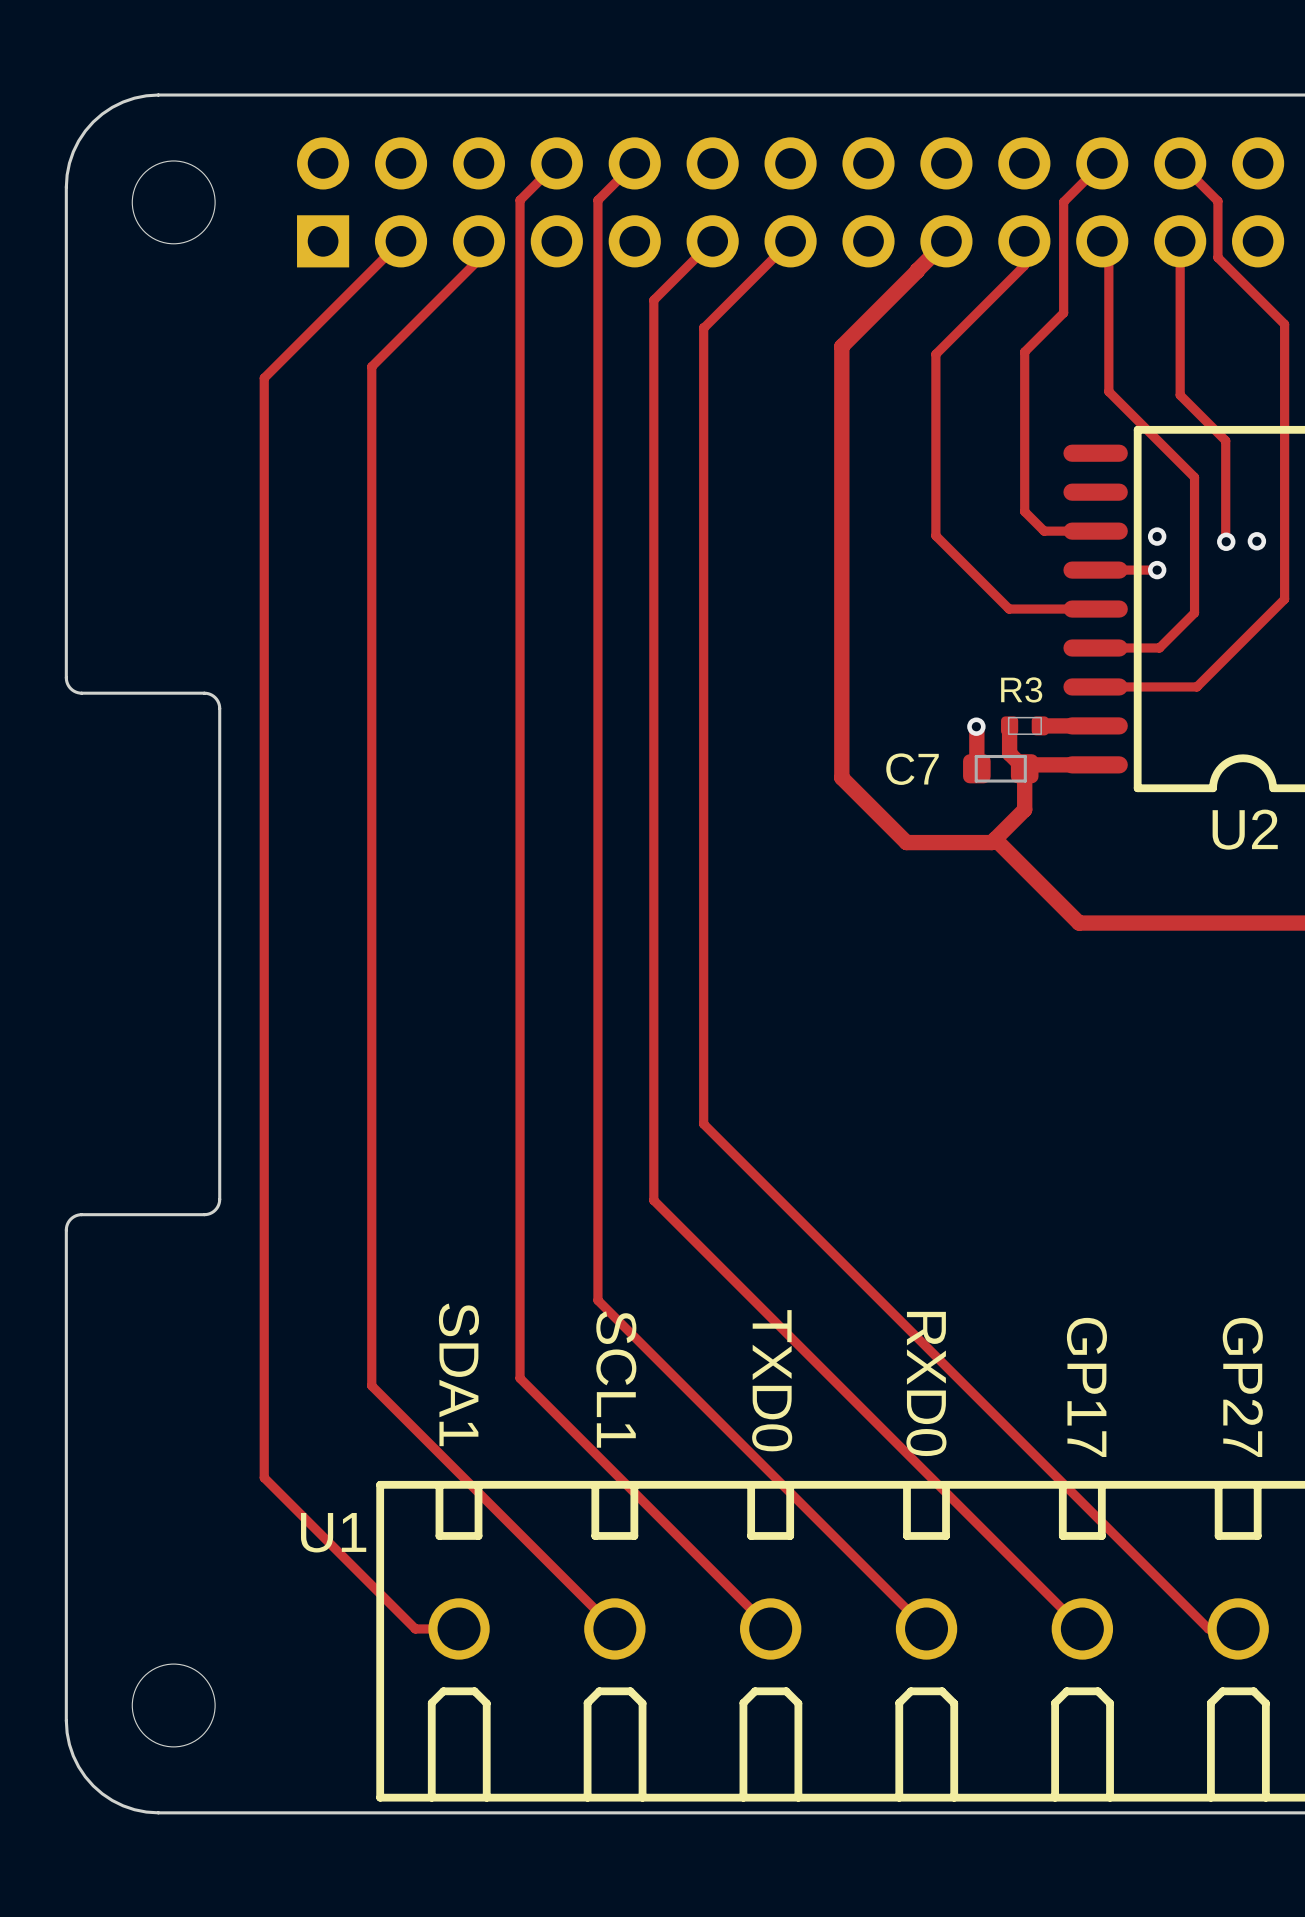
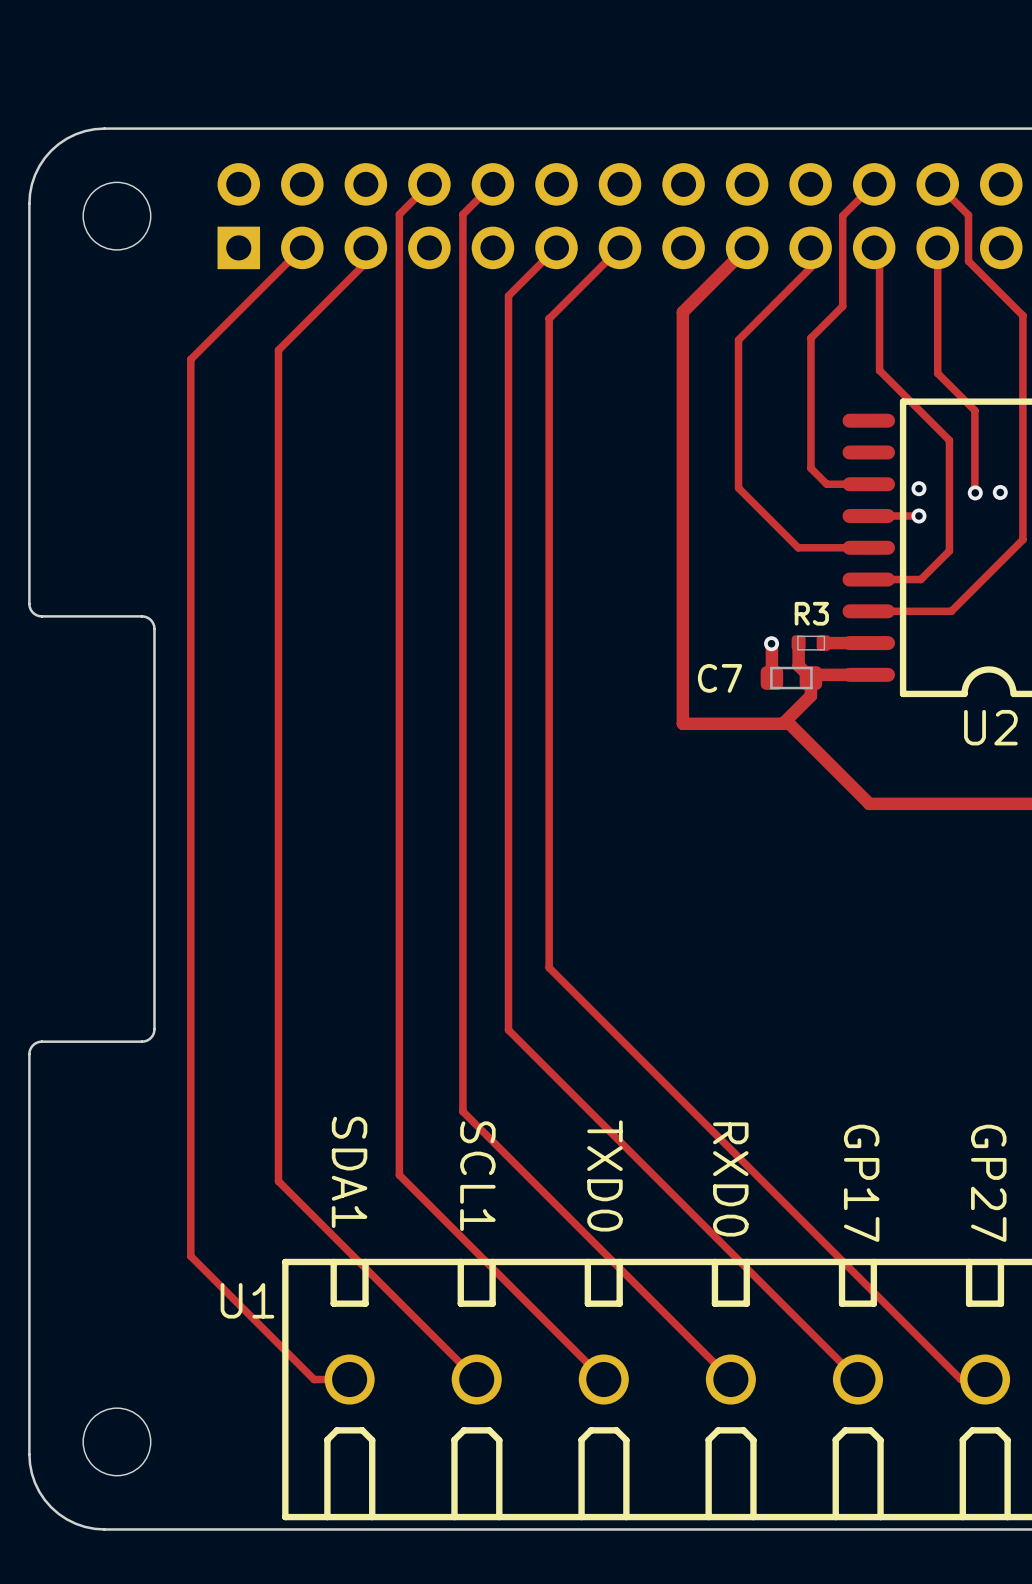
track: (917, 271) (841, 346) (841, 777) (906, 842) (991, 842) (1024, 809) (1024, 790) -> (723, 271) (682, 312) (682, 723) (789, 723) (869, 803)
track: none -> (810, 695) (782, 723)
track: (995, 839) (1079, 923) (1096, 923) -> none

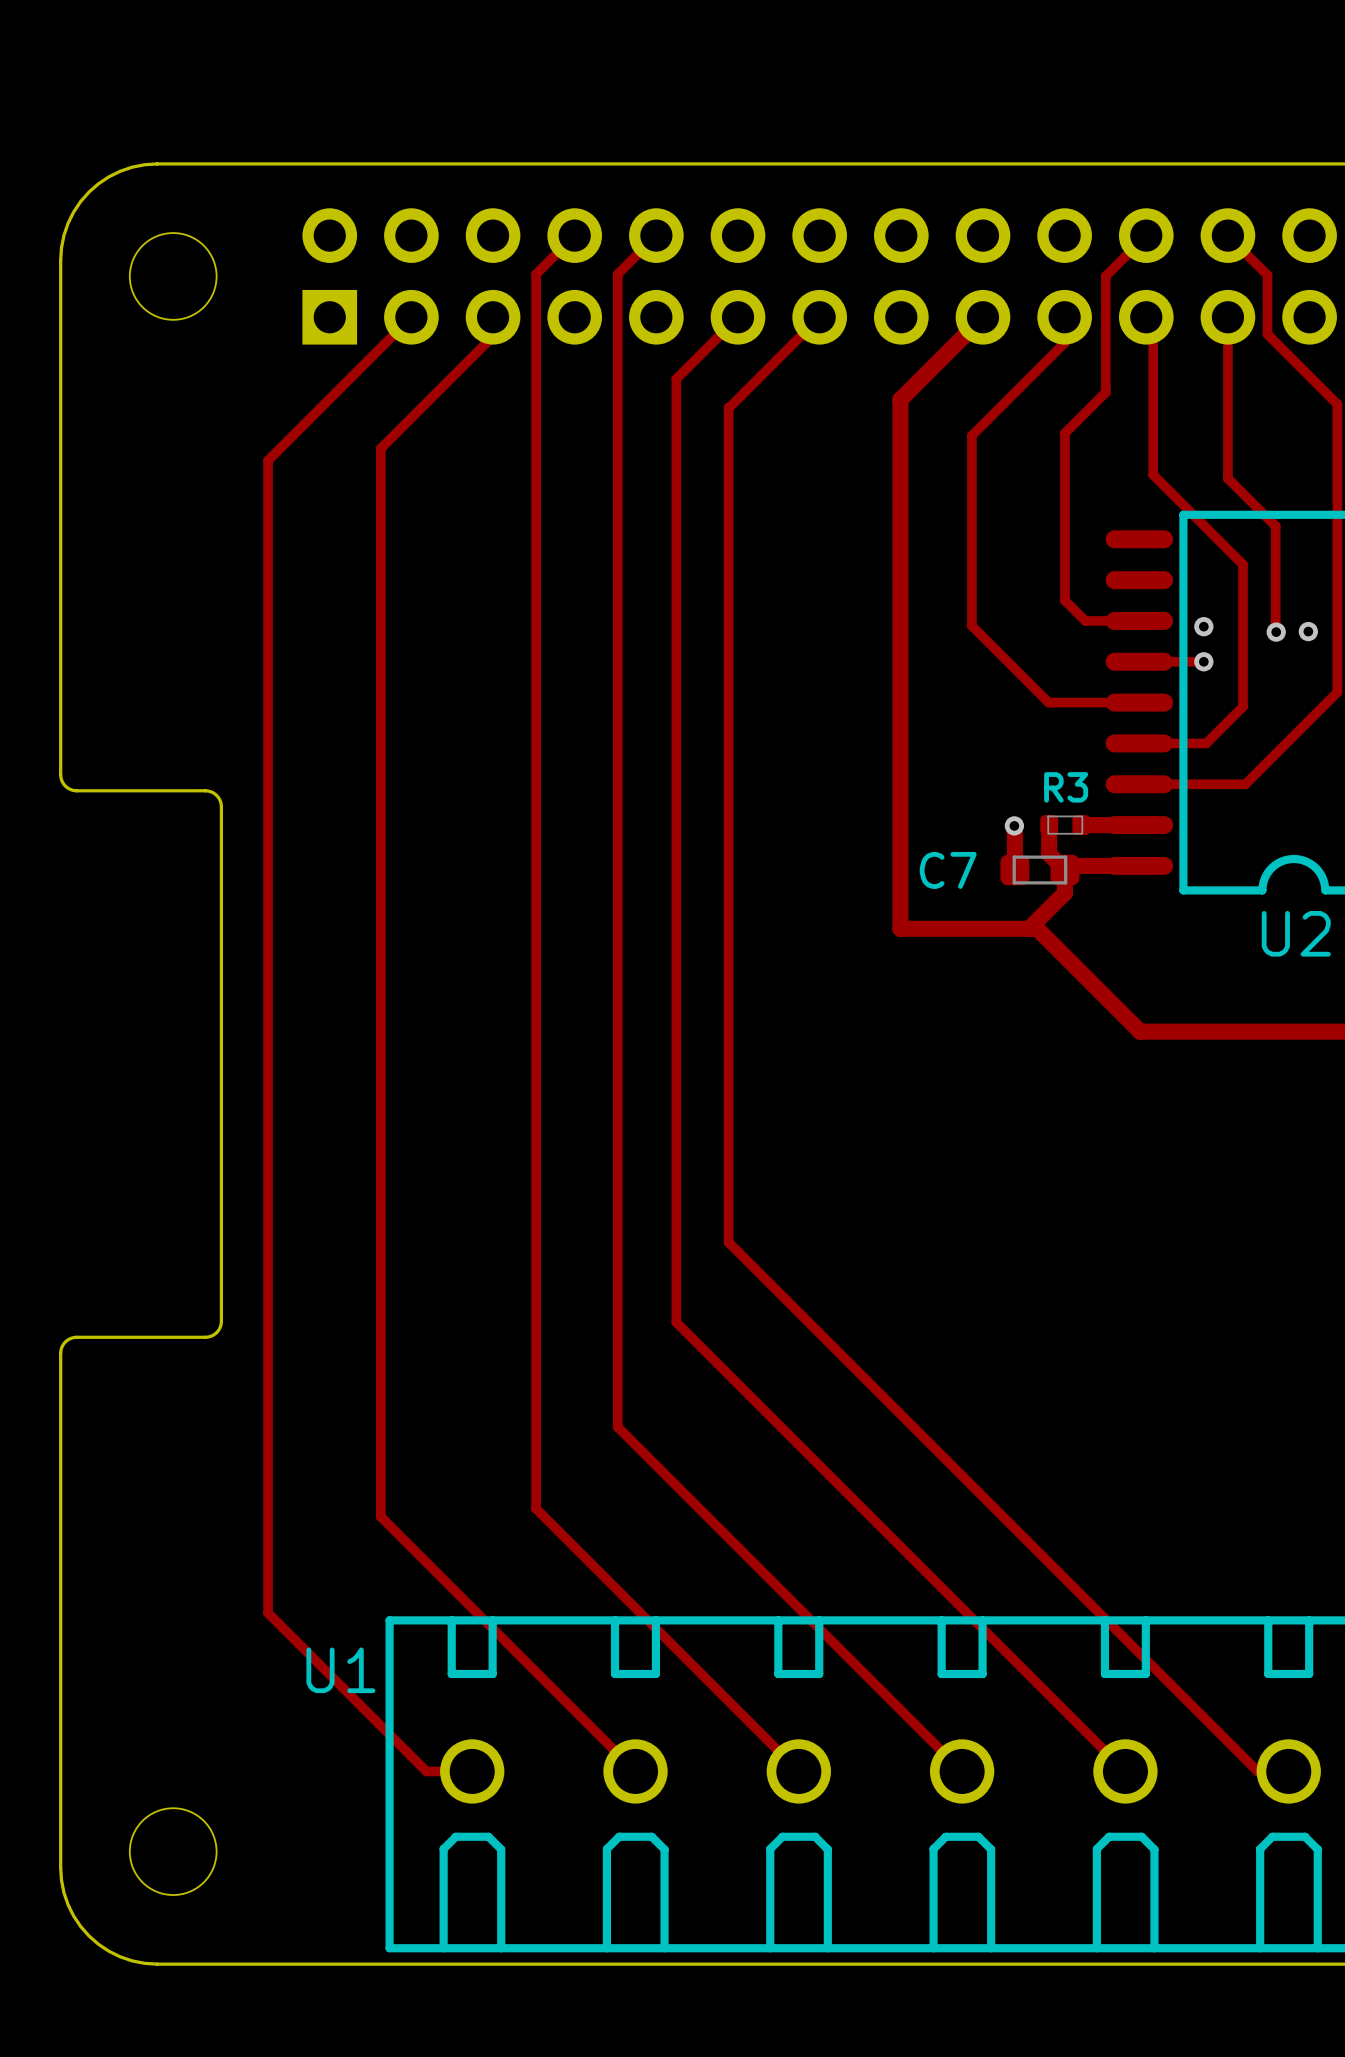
text: SDA1 (349, 1172) -> none
text: TXD0 (604, 1175) -> none
text: SCL1 (477, 1176) -> none
text: RXD0 (730, 1179) -> none
text: GP17 (861, 1183) -> none
text: GP27 (988, 1183) -> none

